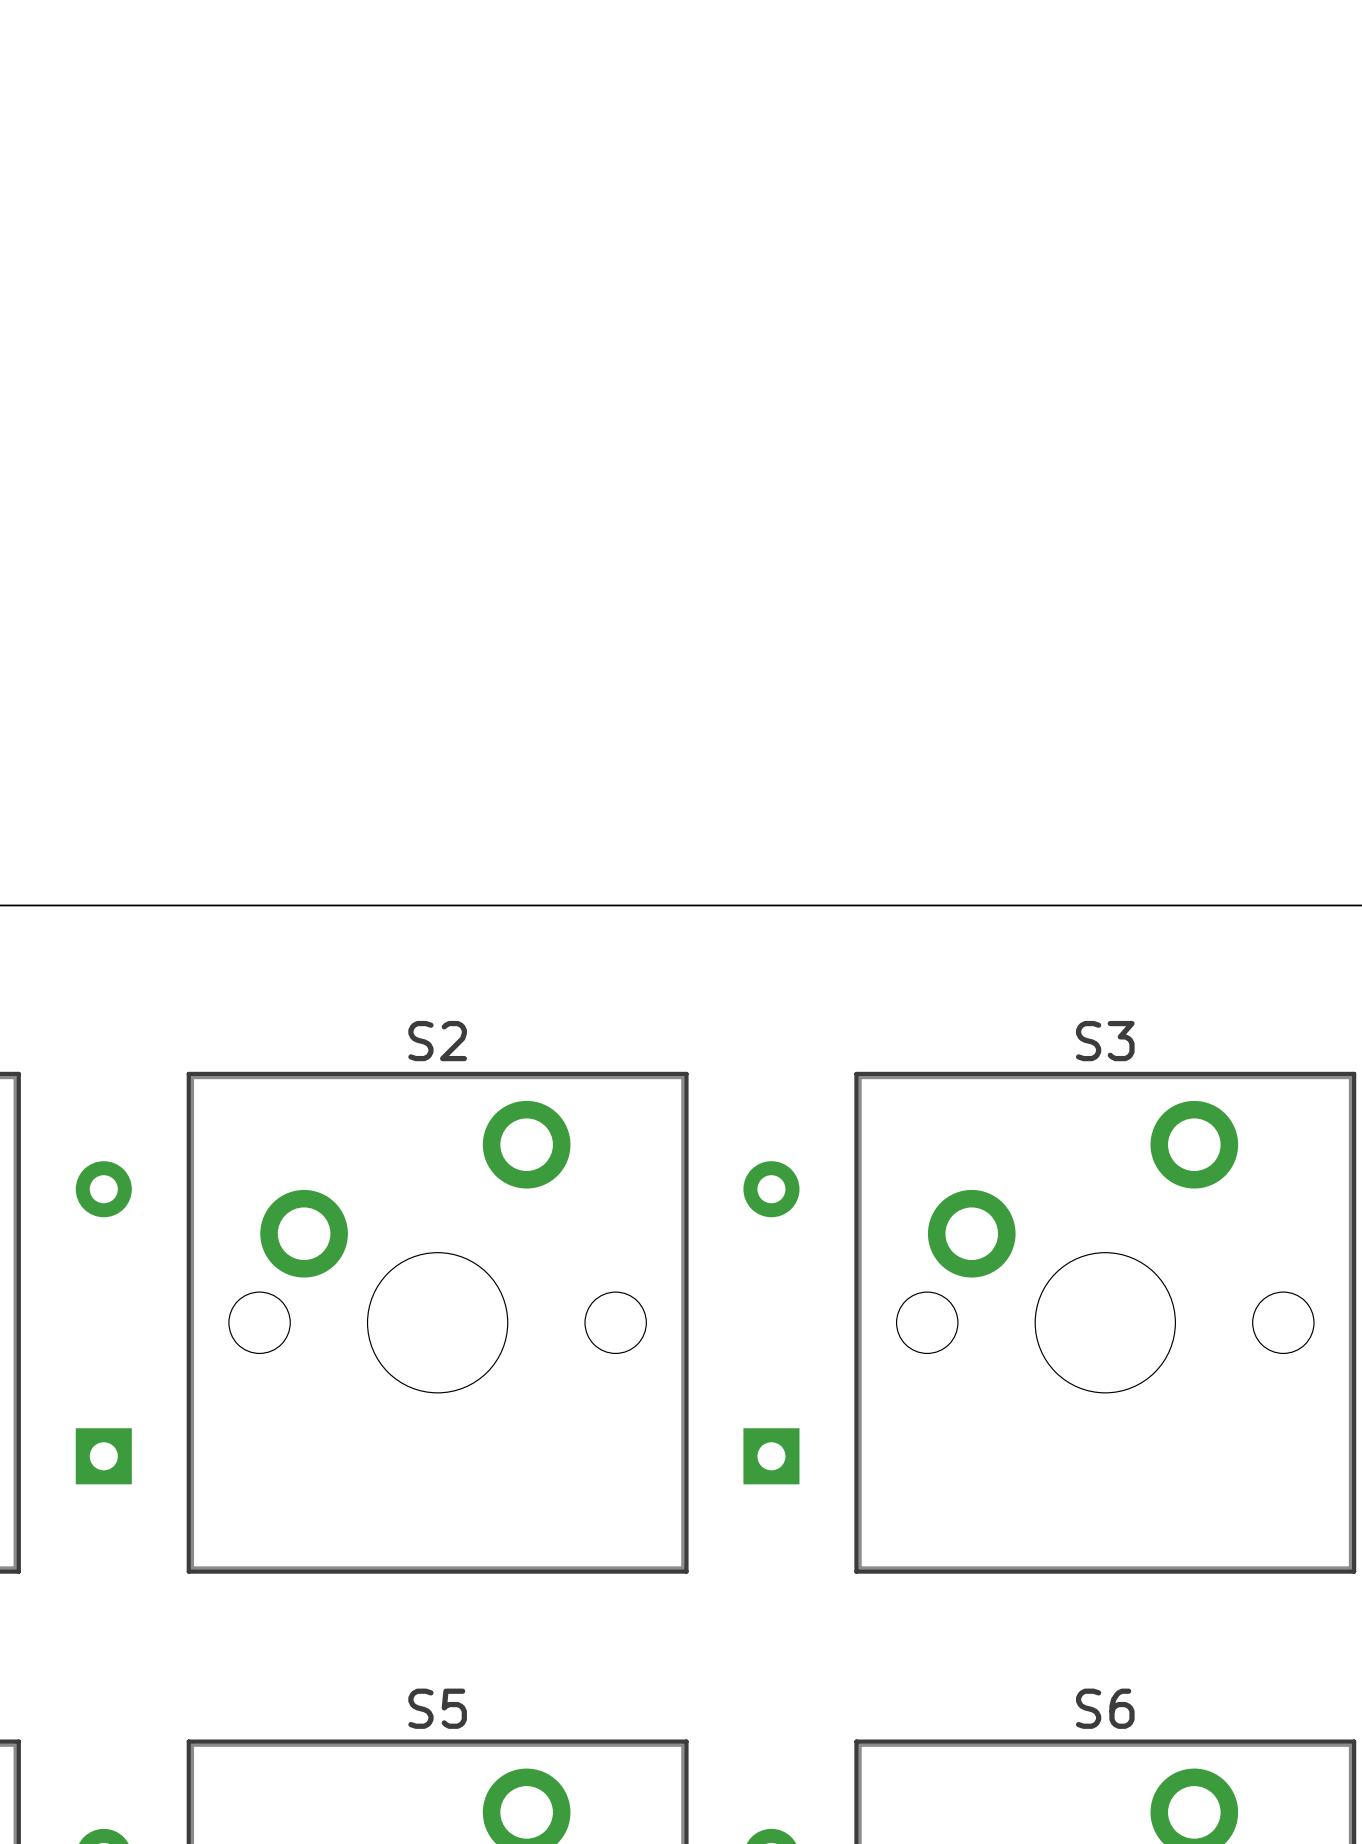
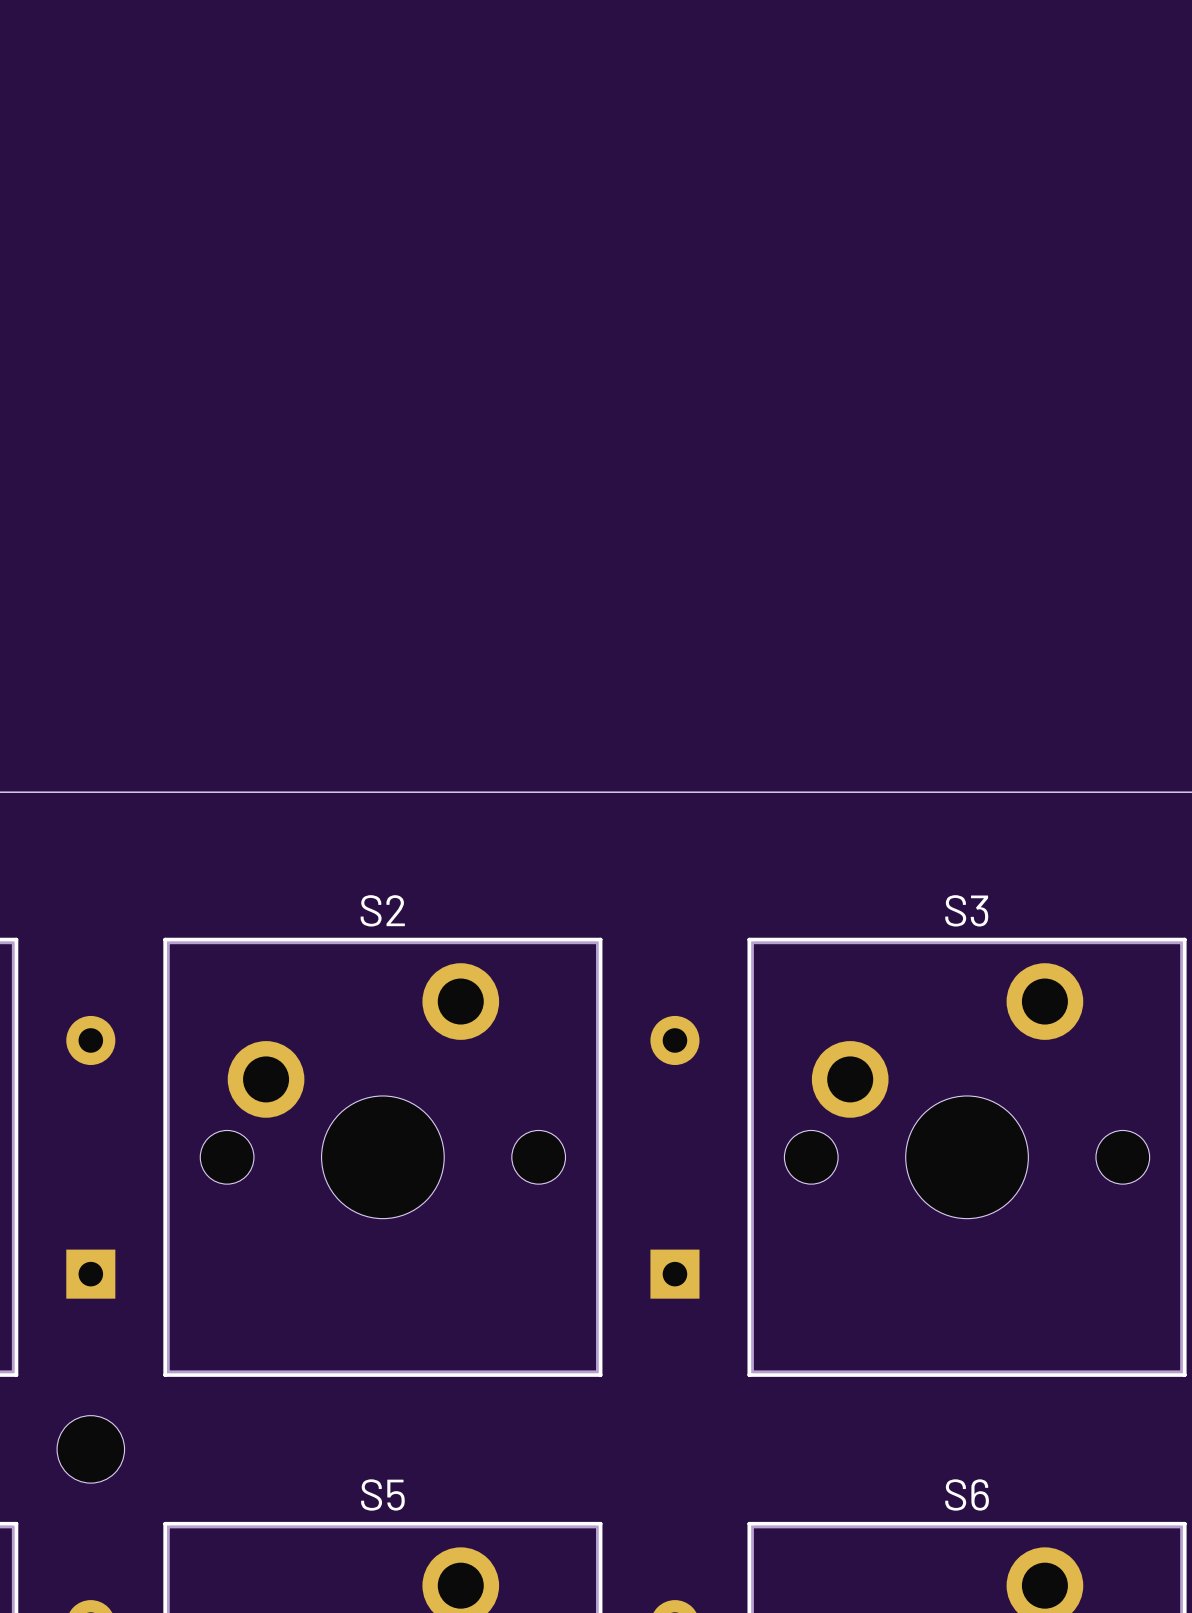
part: none -> (90, 1449)

